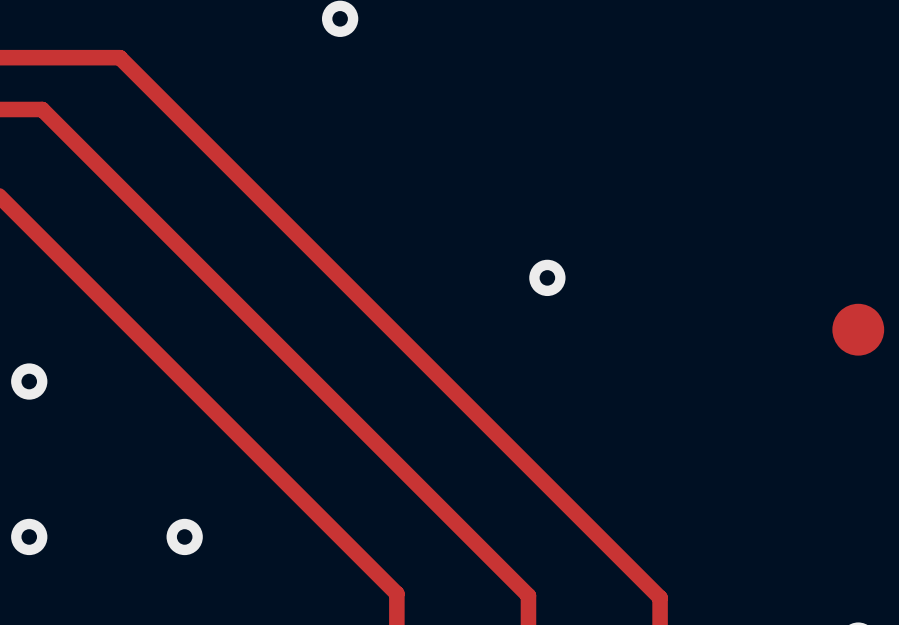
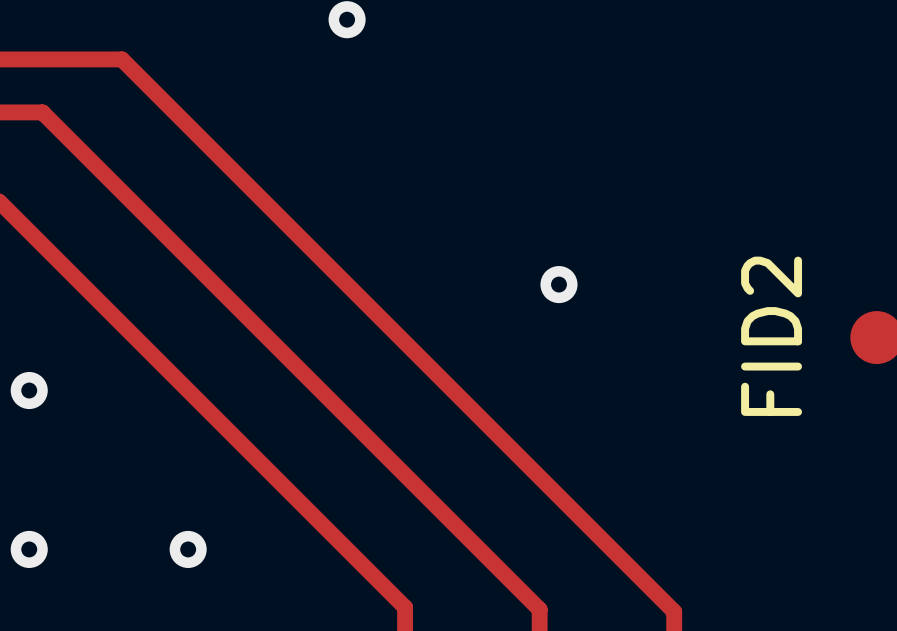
FID2 name: none -> FID2 (771, 336)

